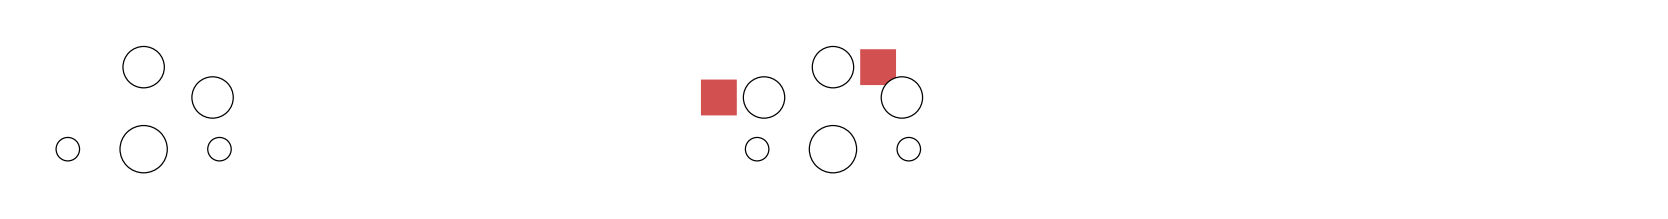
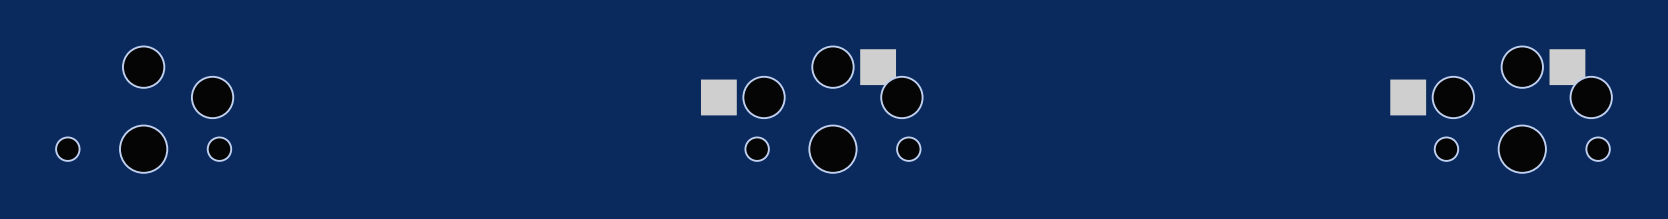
part: none -> (1501, 109)

